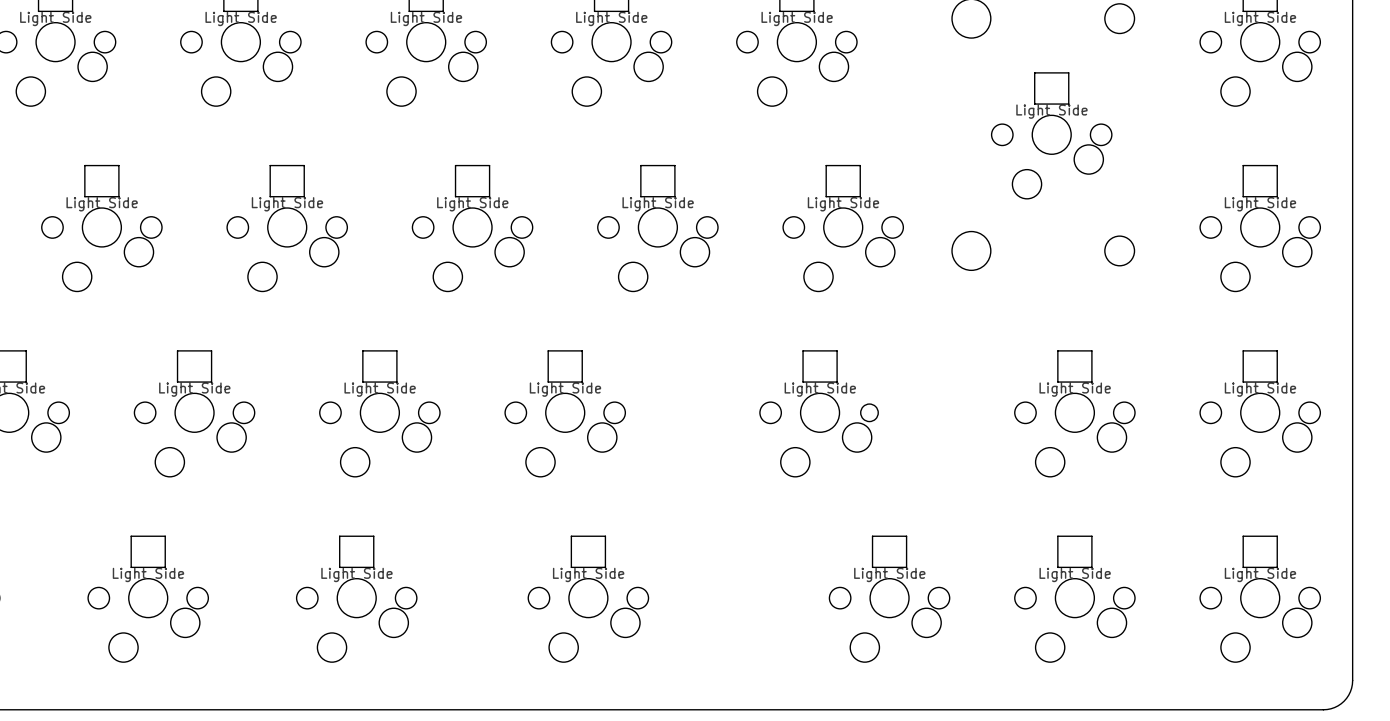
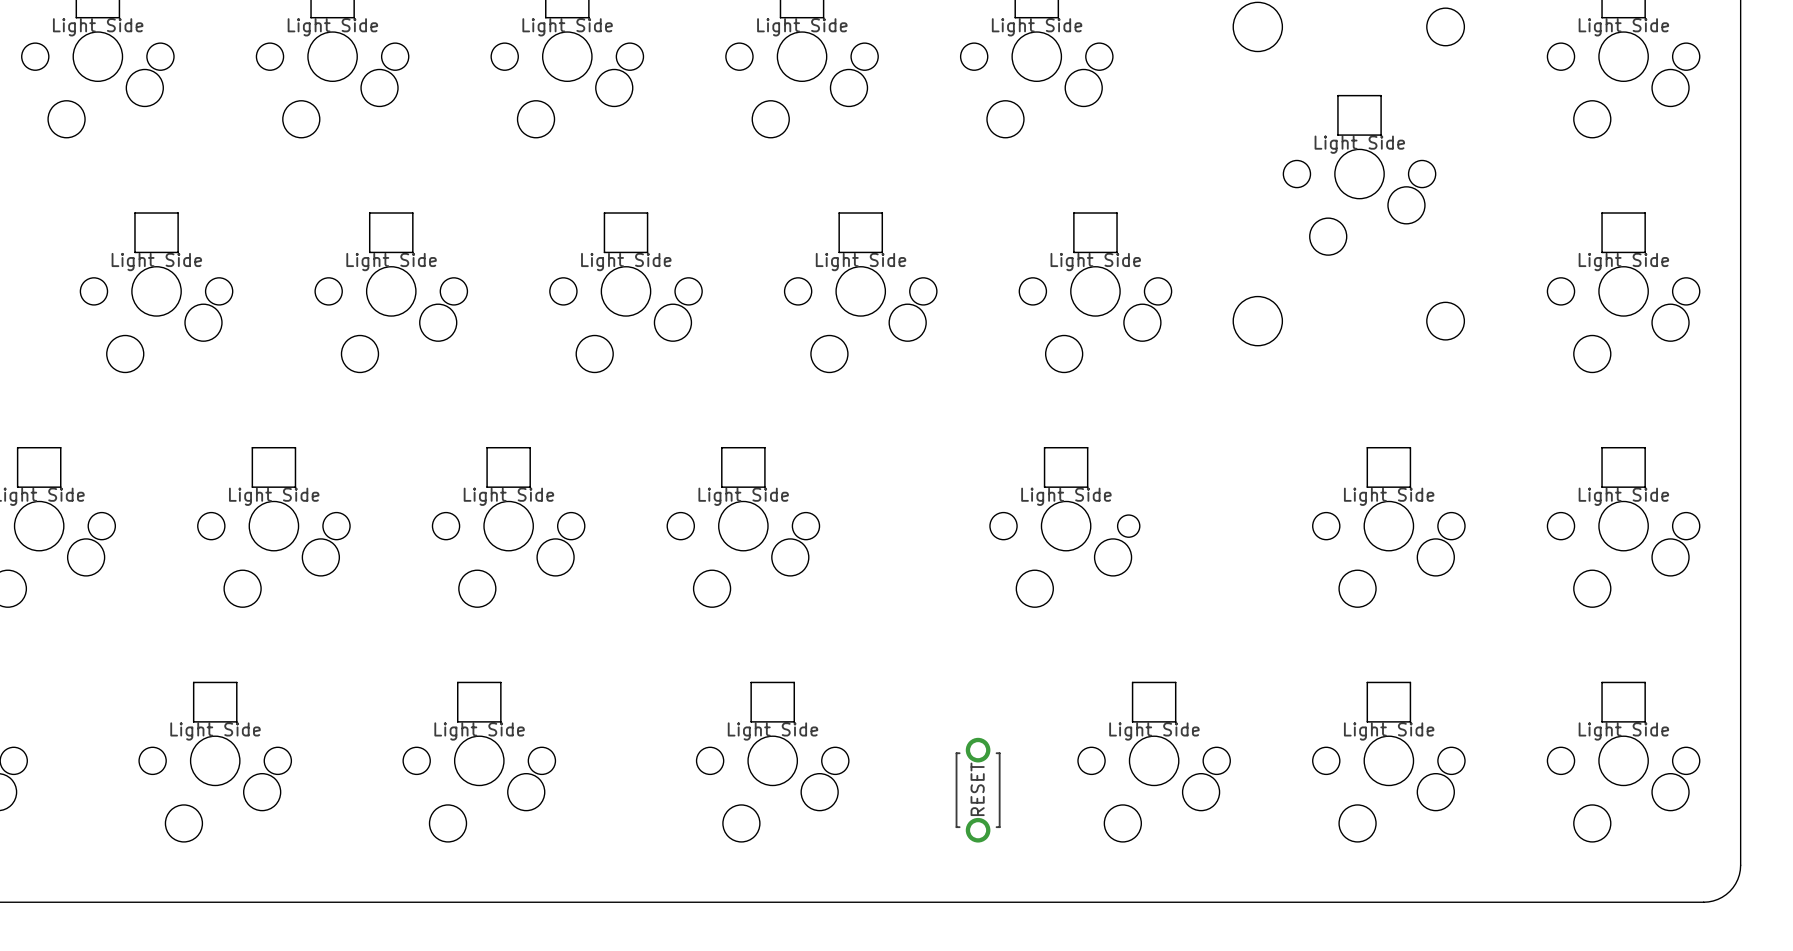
part: none -> (978, 790)

